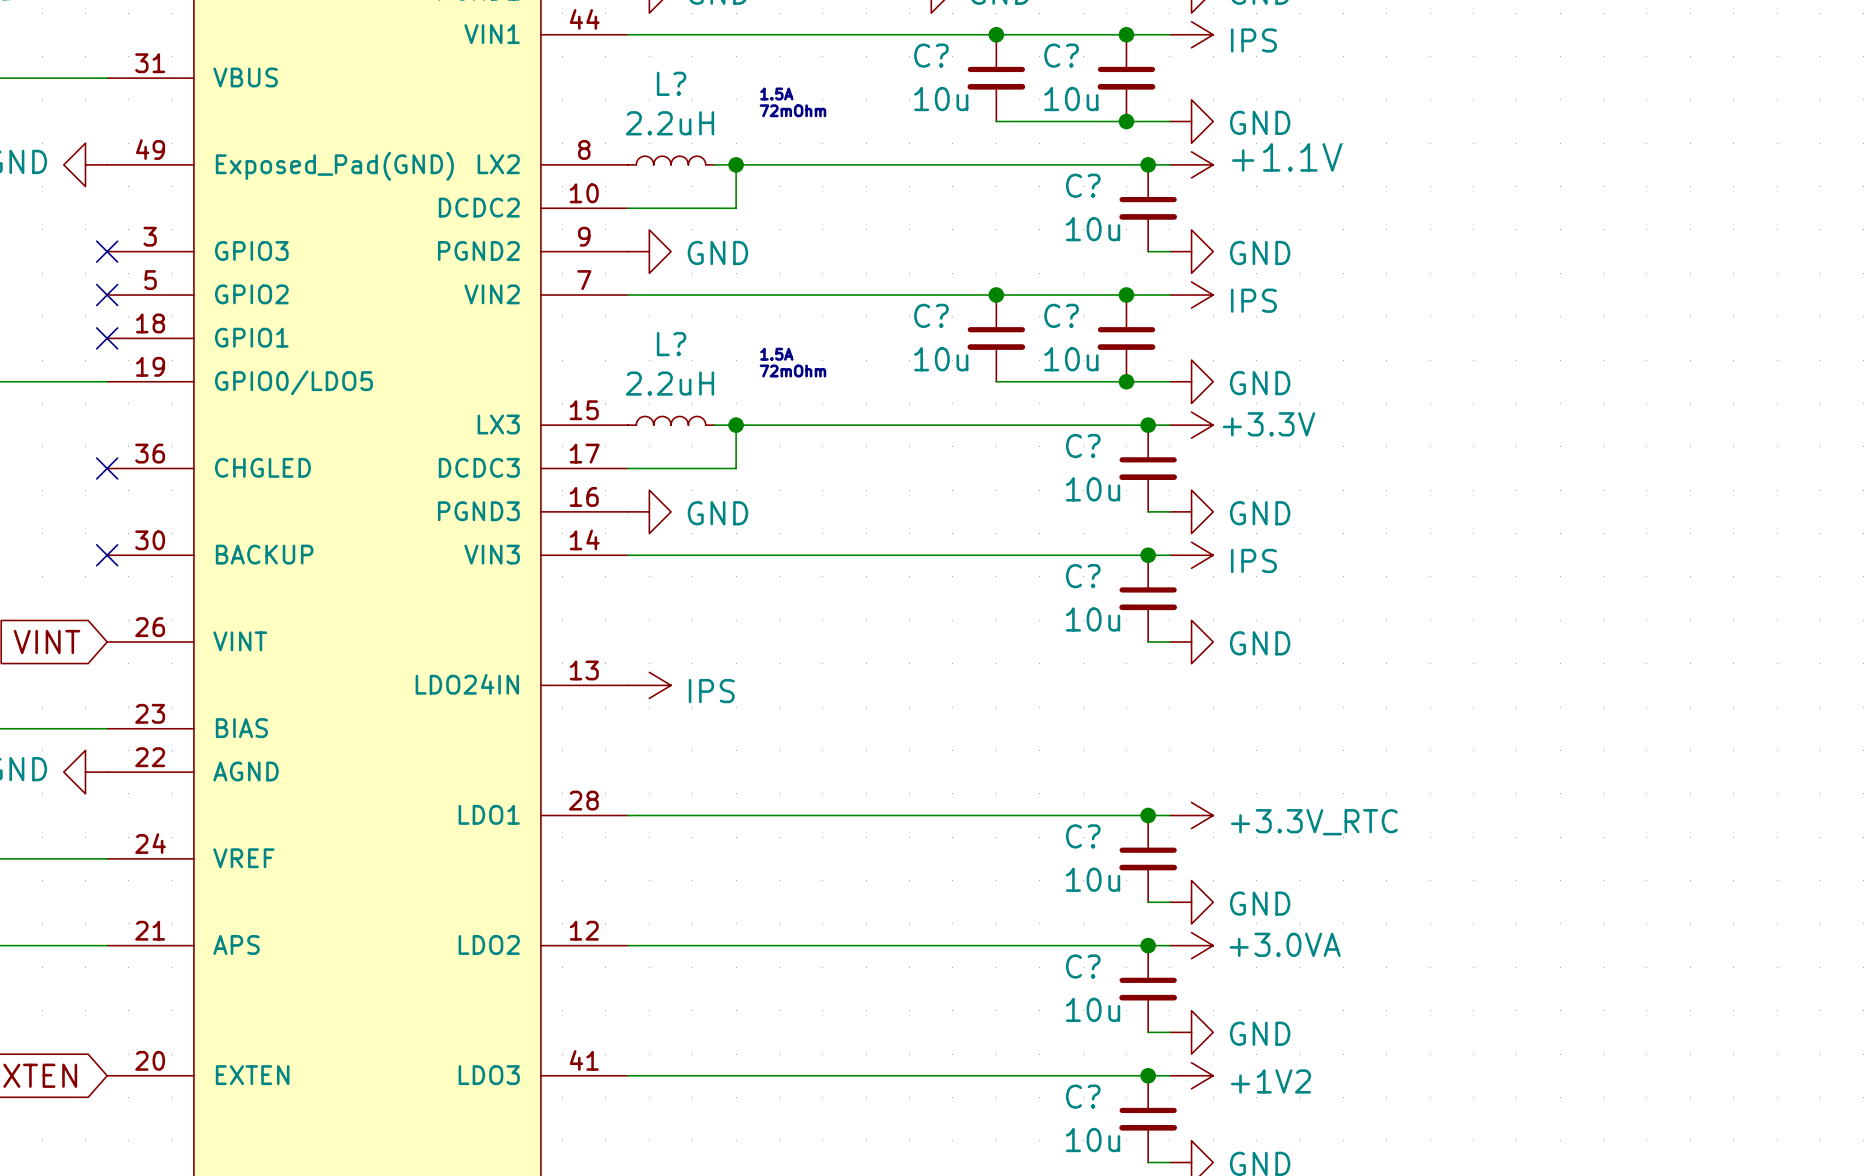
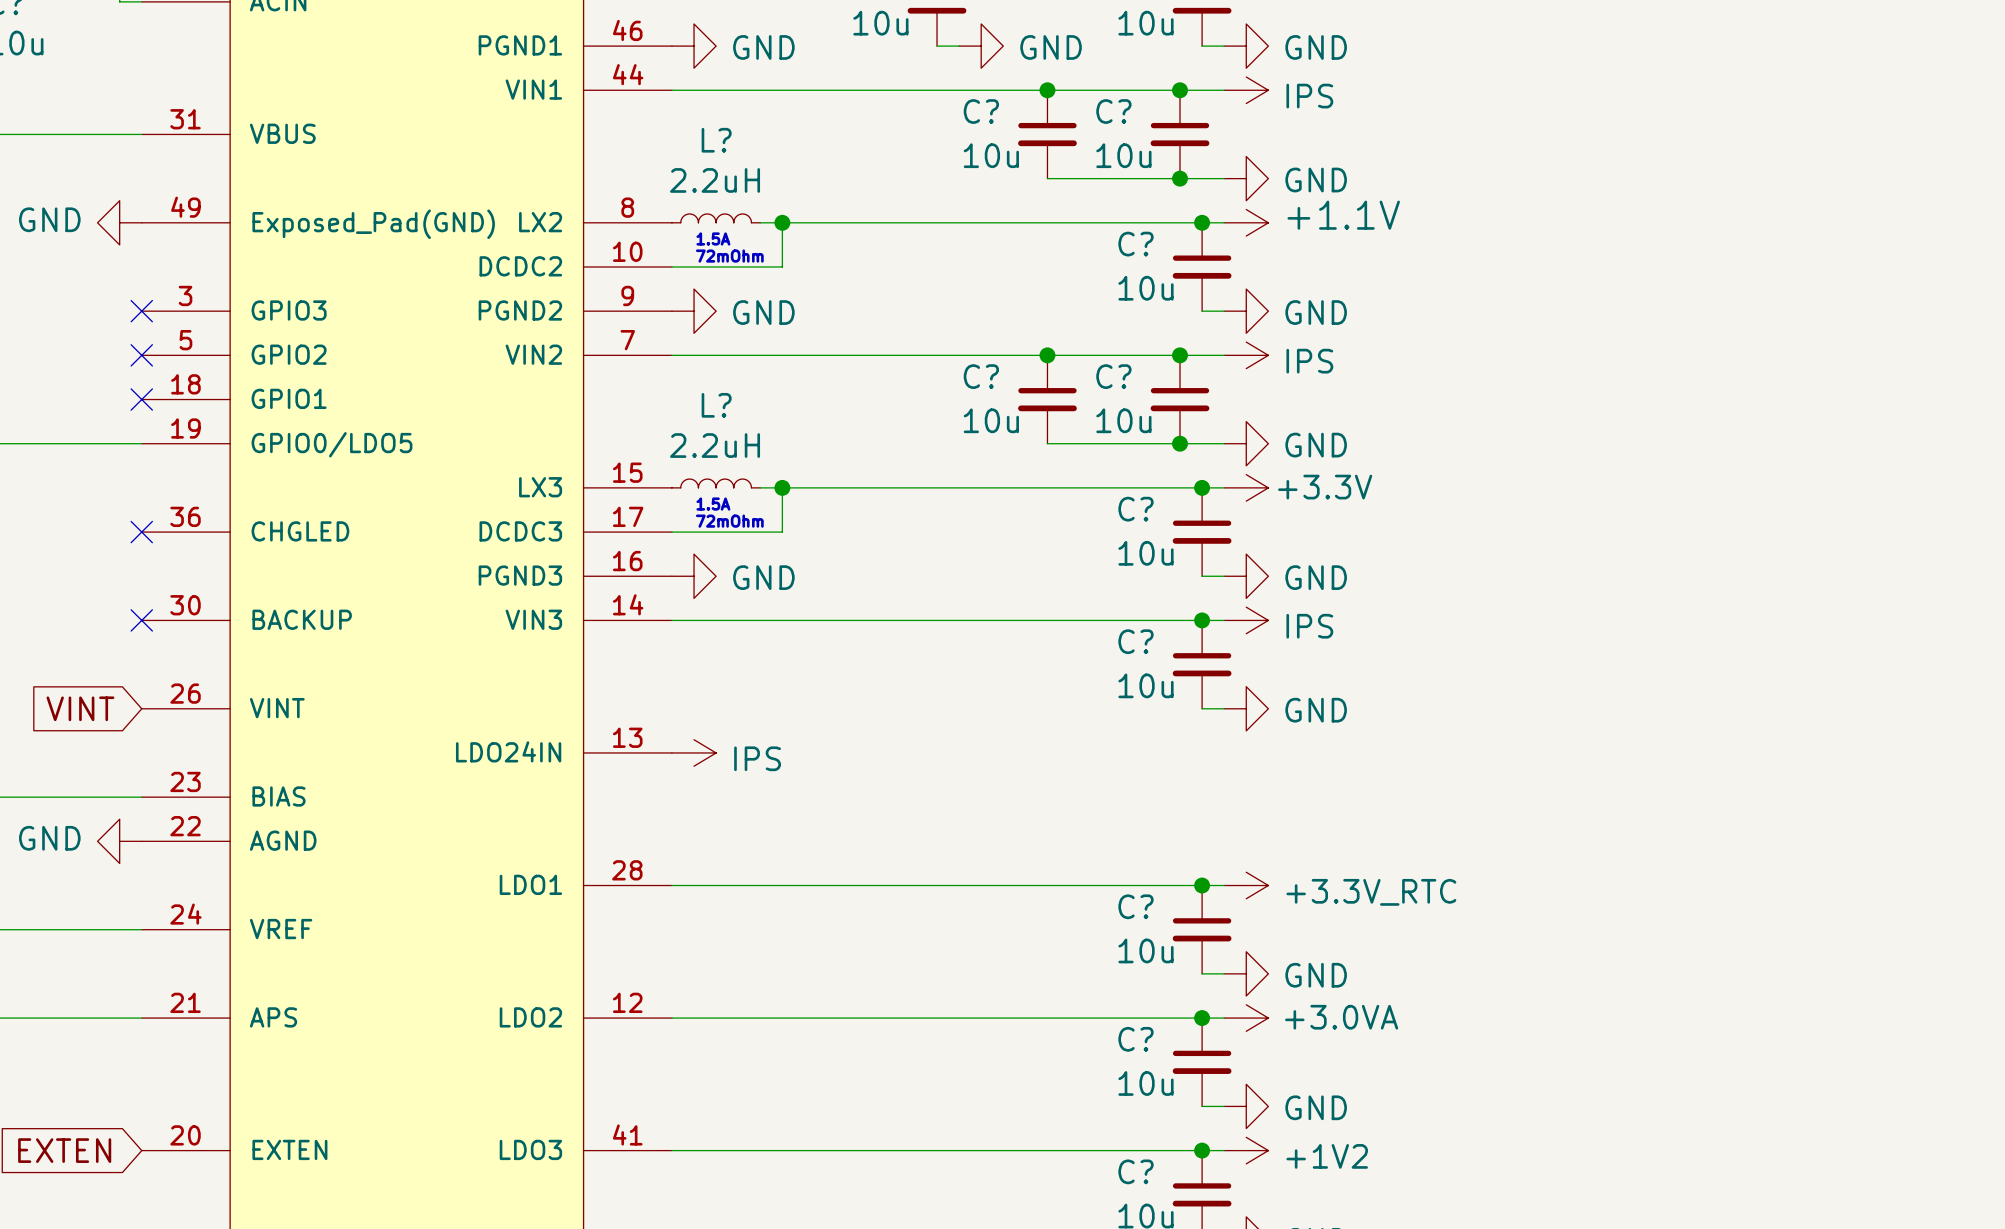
text: 1.5A (776, 94) -> none
text: 72mOhm (792, 110) -> none
text: none -> 1.5A (713, 238)
text: none -> 72mOhm (729, 256)
text: 1.5A (776, 354) -> none
text: 72mOhm (792, 371) -> none
text: none -> 1.5A (713, 504)
text: none -> 72mOhm (729, 521)

